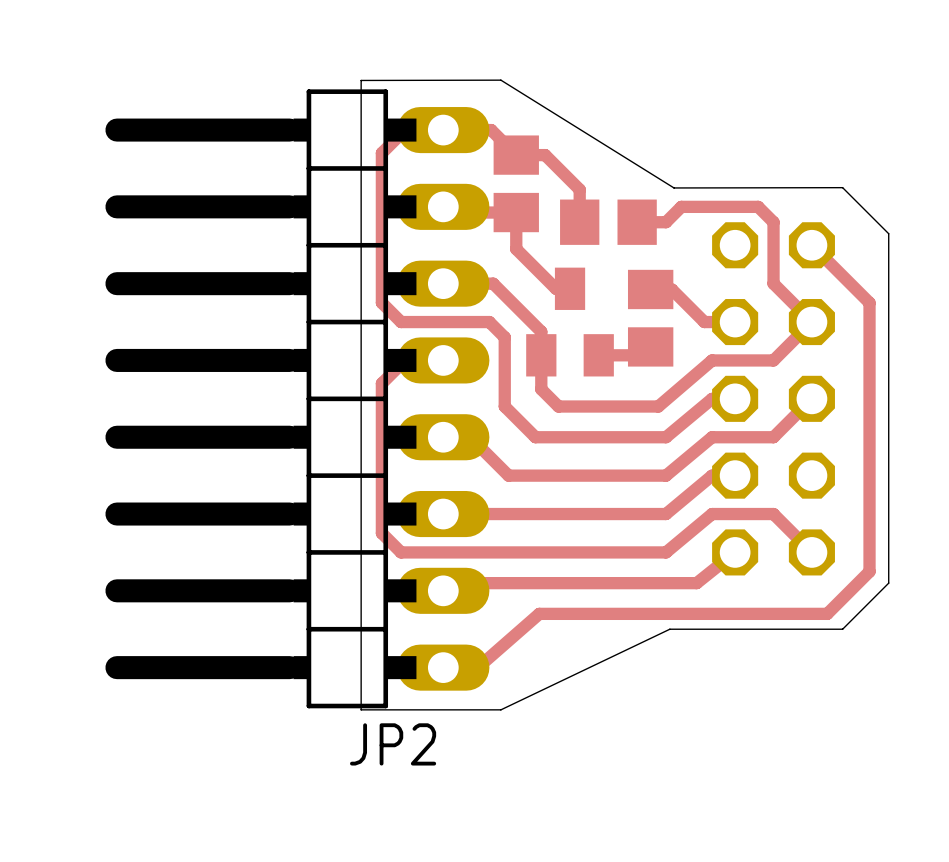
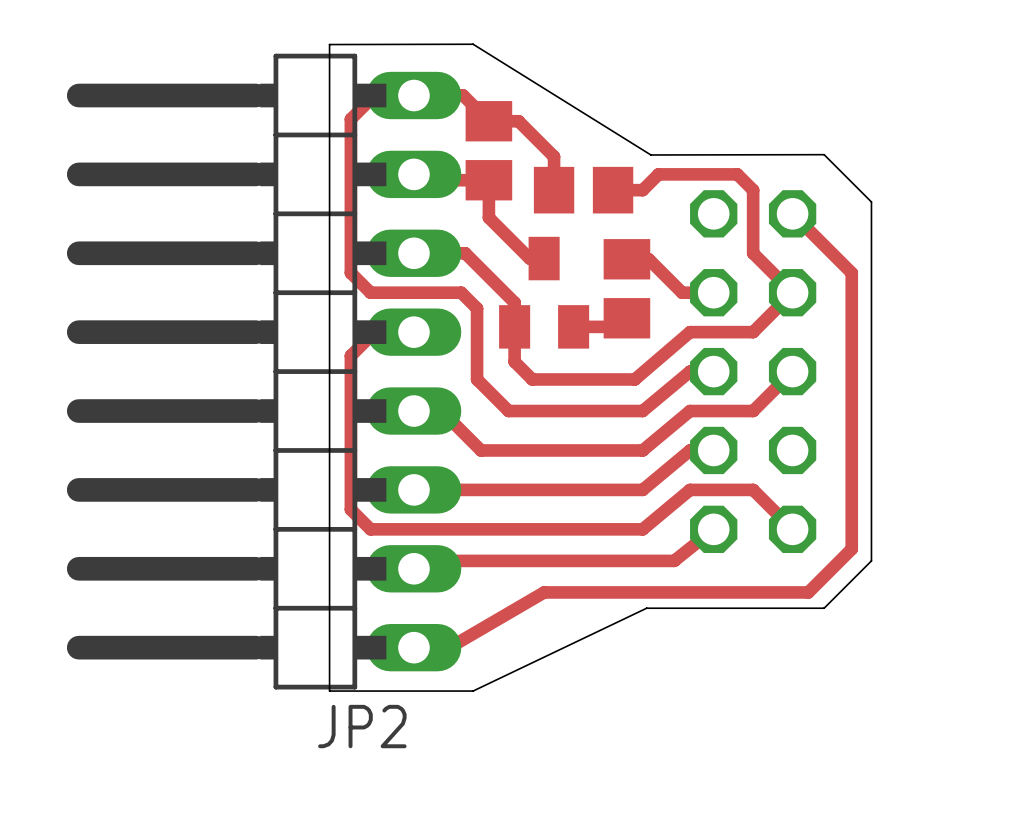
top track: (570, 613) (539, 613) (477, 667) -> (544, 592) (449, 647)

